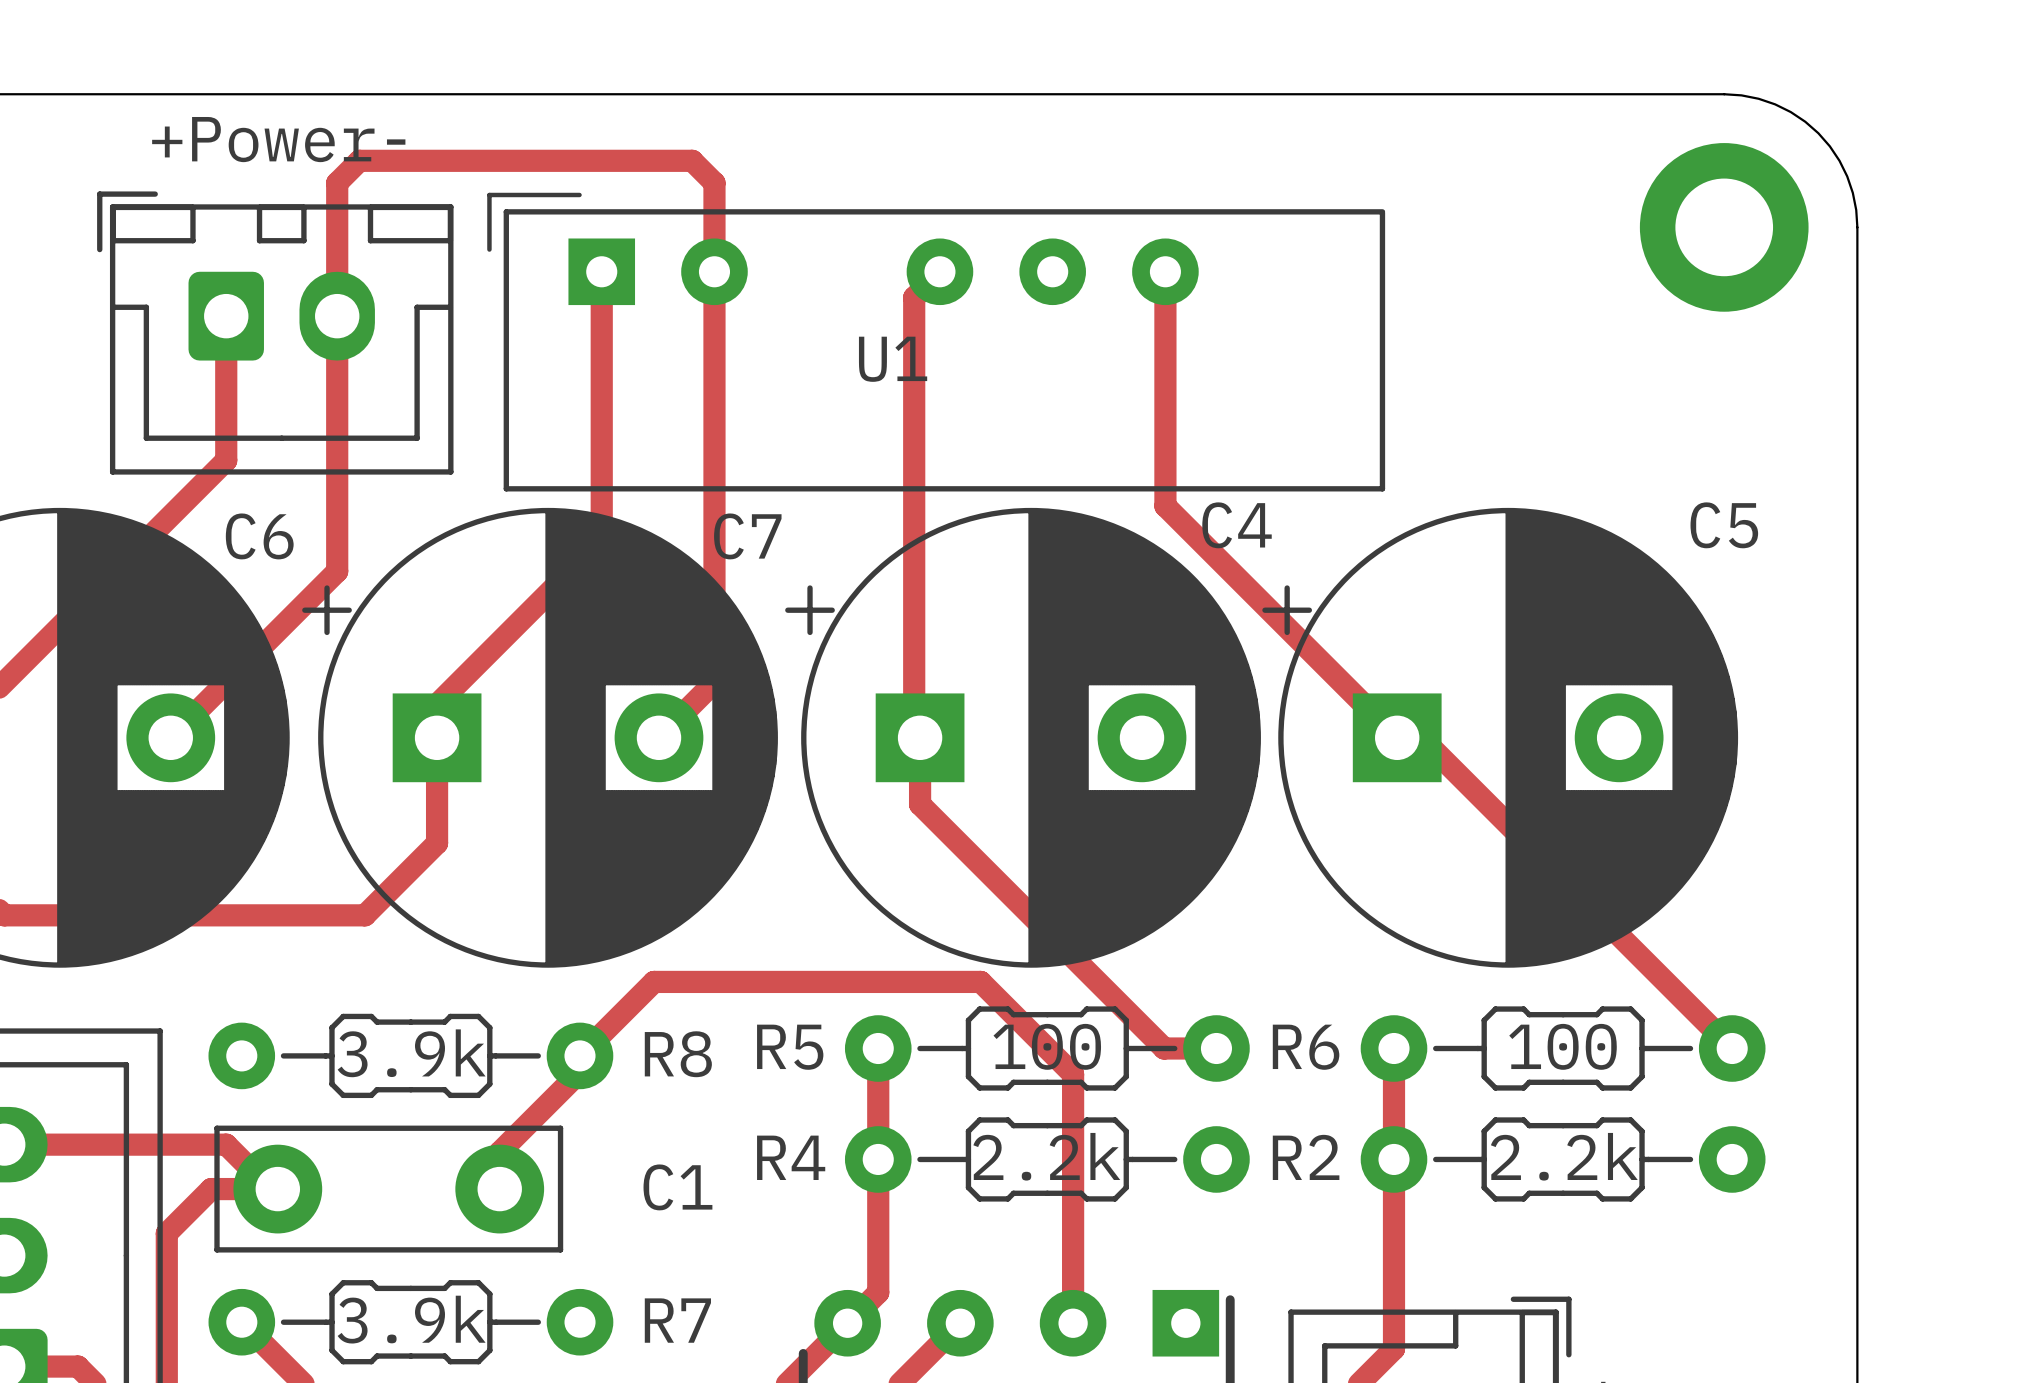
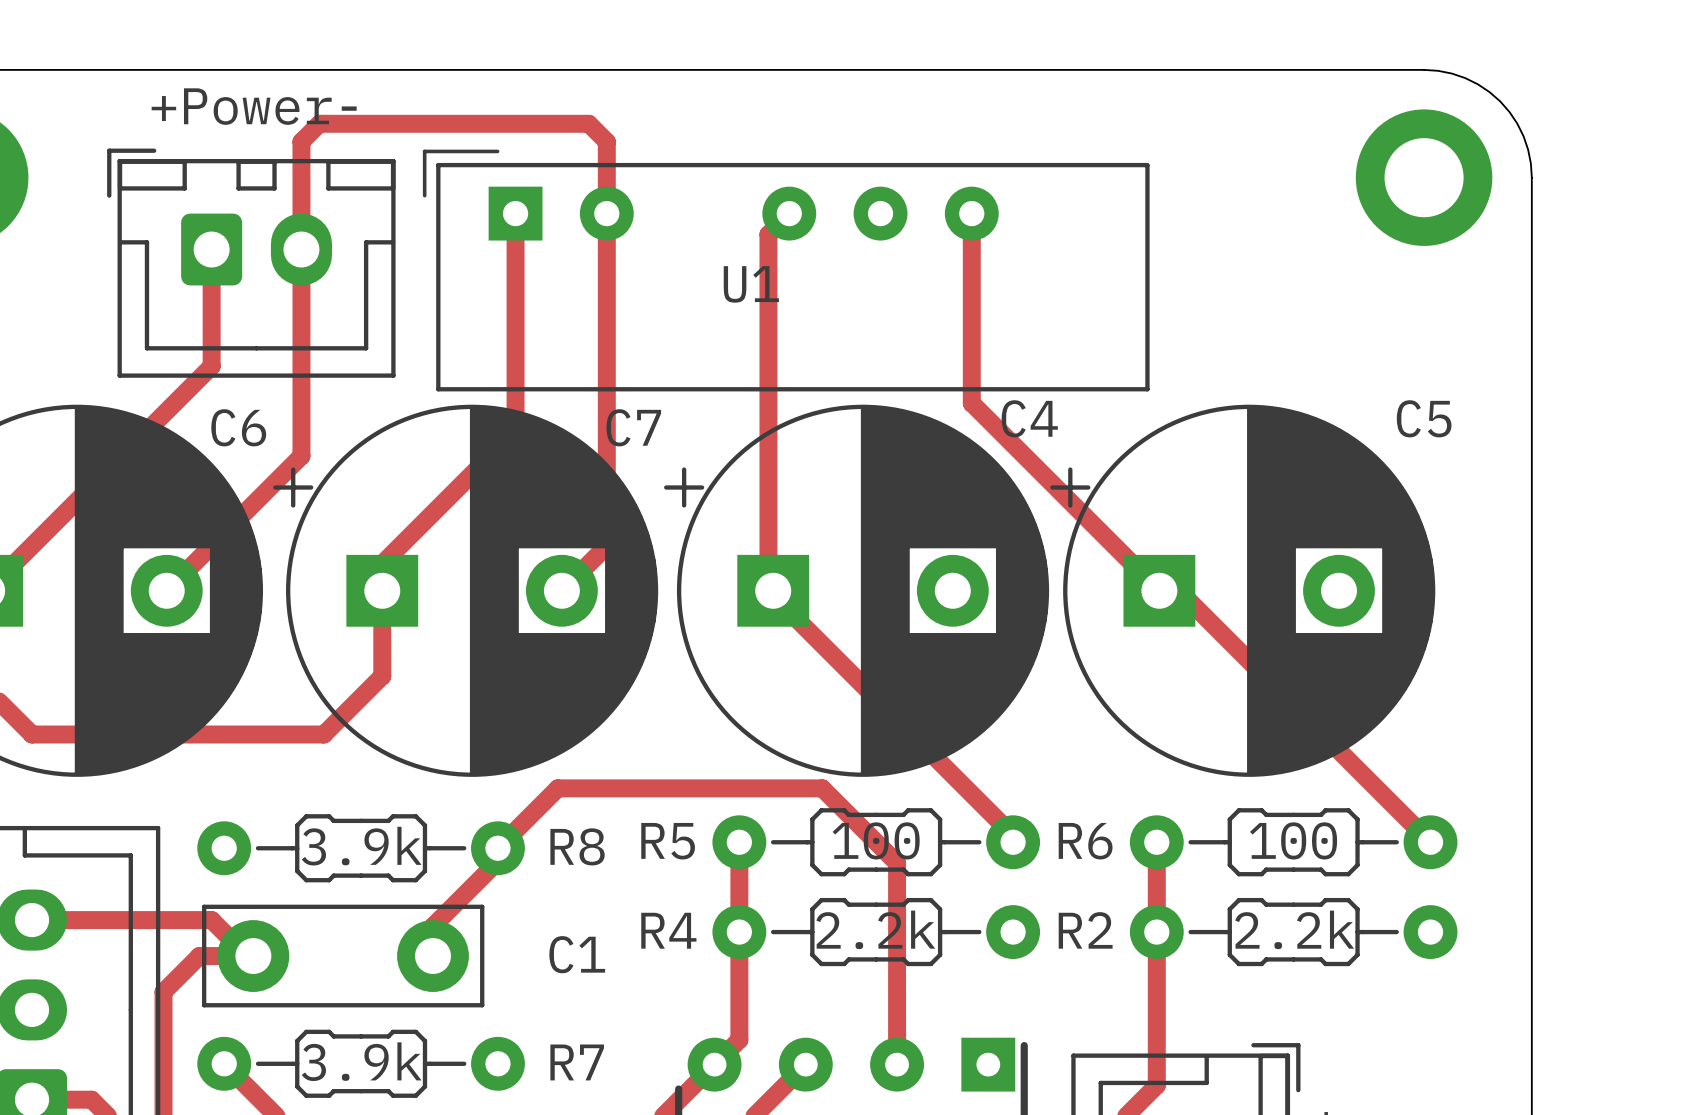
track: (920, 743) (920, 804) (1164, 1048) (1216, 1048) -> (773, 595) (1013, 835) (1013, 842)

